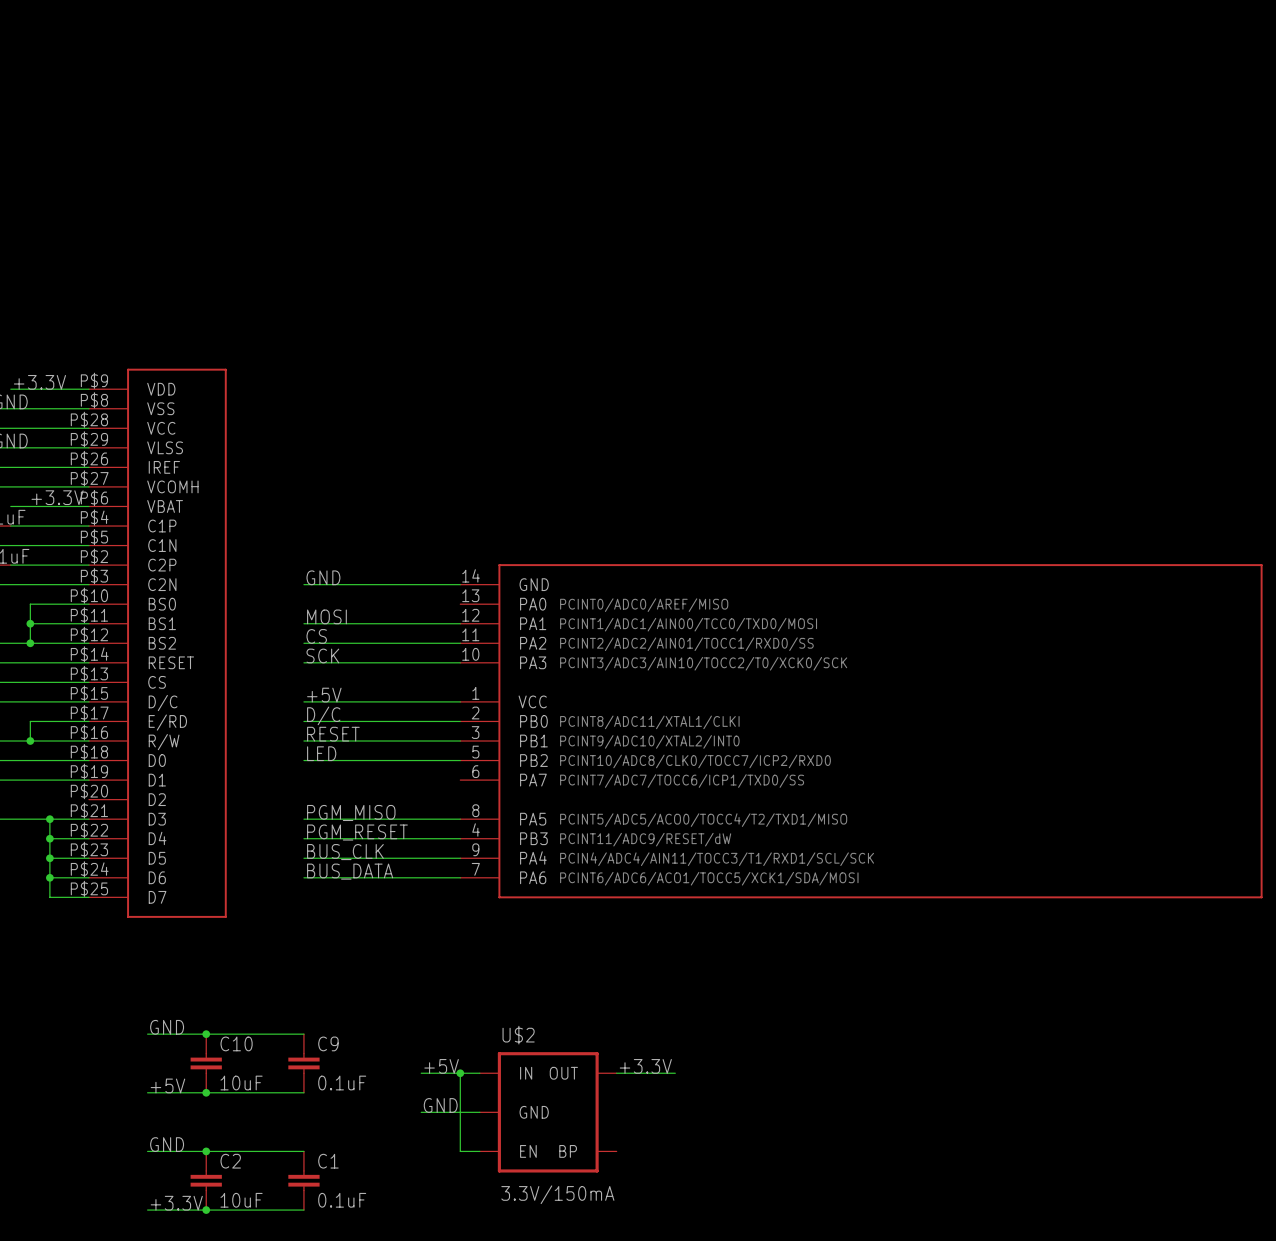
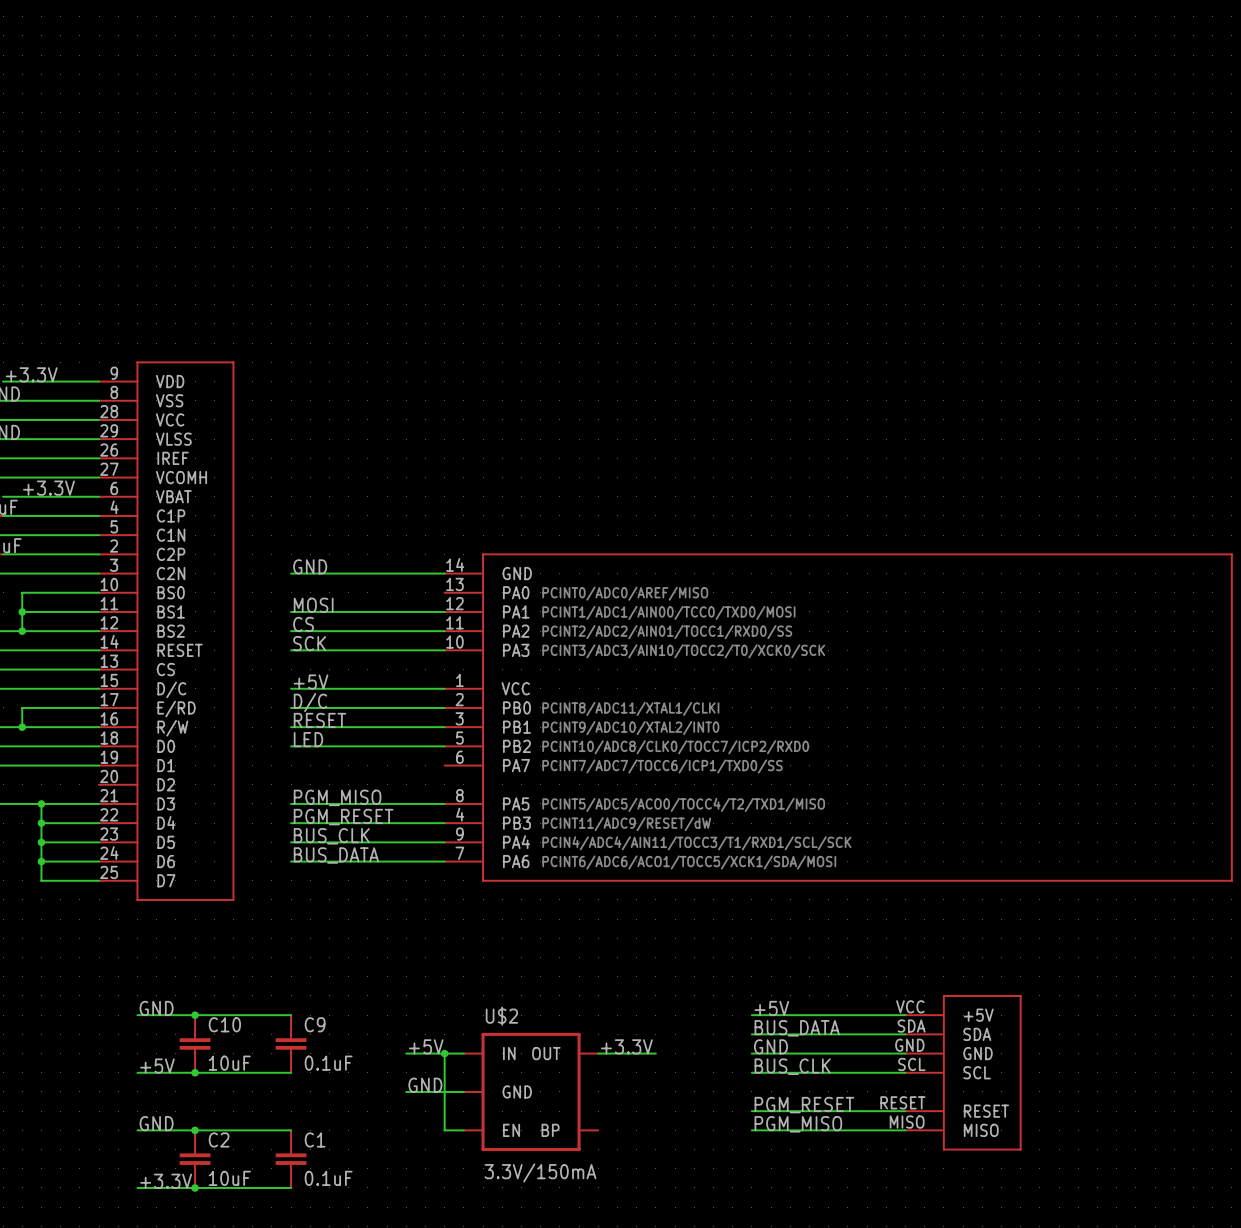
part: (157, 643) -> none
part: none -> (166, 631)
label: none -> +5V (771, 1008)
wire: none -> (751, 1015) (905, 1015)
label: none -> BUS_DATA (797, 1028)
wire: none -> (751, 1034) (905, 1034)
label: none -> GND (771, 1046)
wire: none -> (751, 1053) (905, 1053)
label: none -> BUS_CLK (792, 1066)
wire: none -> (751, 1072) (905, 1072)
part: none -> (963, 1072)
label: none -> PGM_RESET (804, 1105)
wire: none -> (751, 1111) (905, 1111)
label: none -> PGM_MISO (798, 1124)
wire: none -> (751, 1130) (905, 1130)

